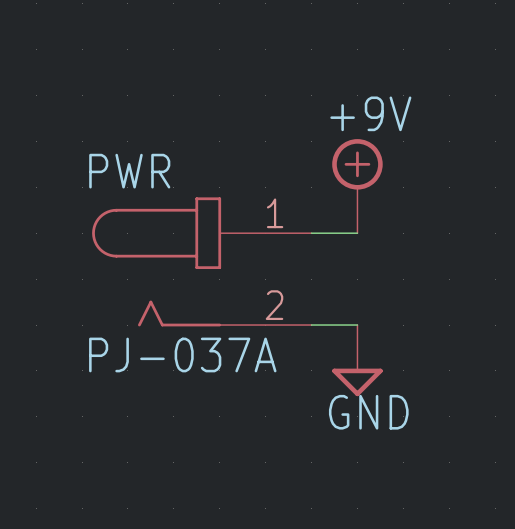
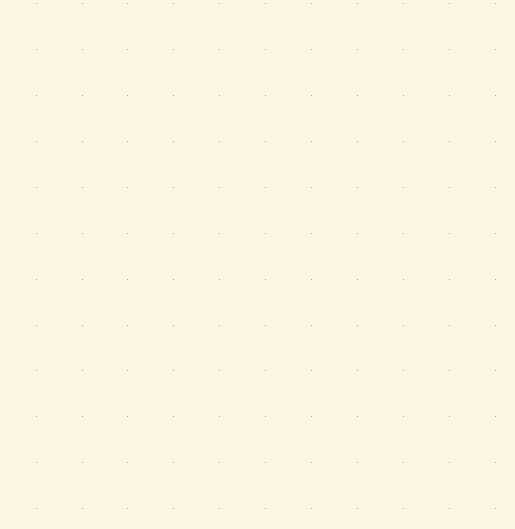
power symbol: +9V (357, 186) -> none
wire: (311, 233) (357, 233) -> none
PWR: PJ-037A (201, 261) -> none
wire: (311, 325) (357, 325) -> none
power symbol: GND (357, 360) -> none

